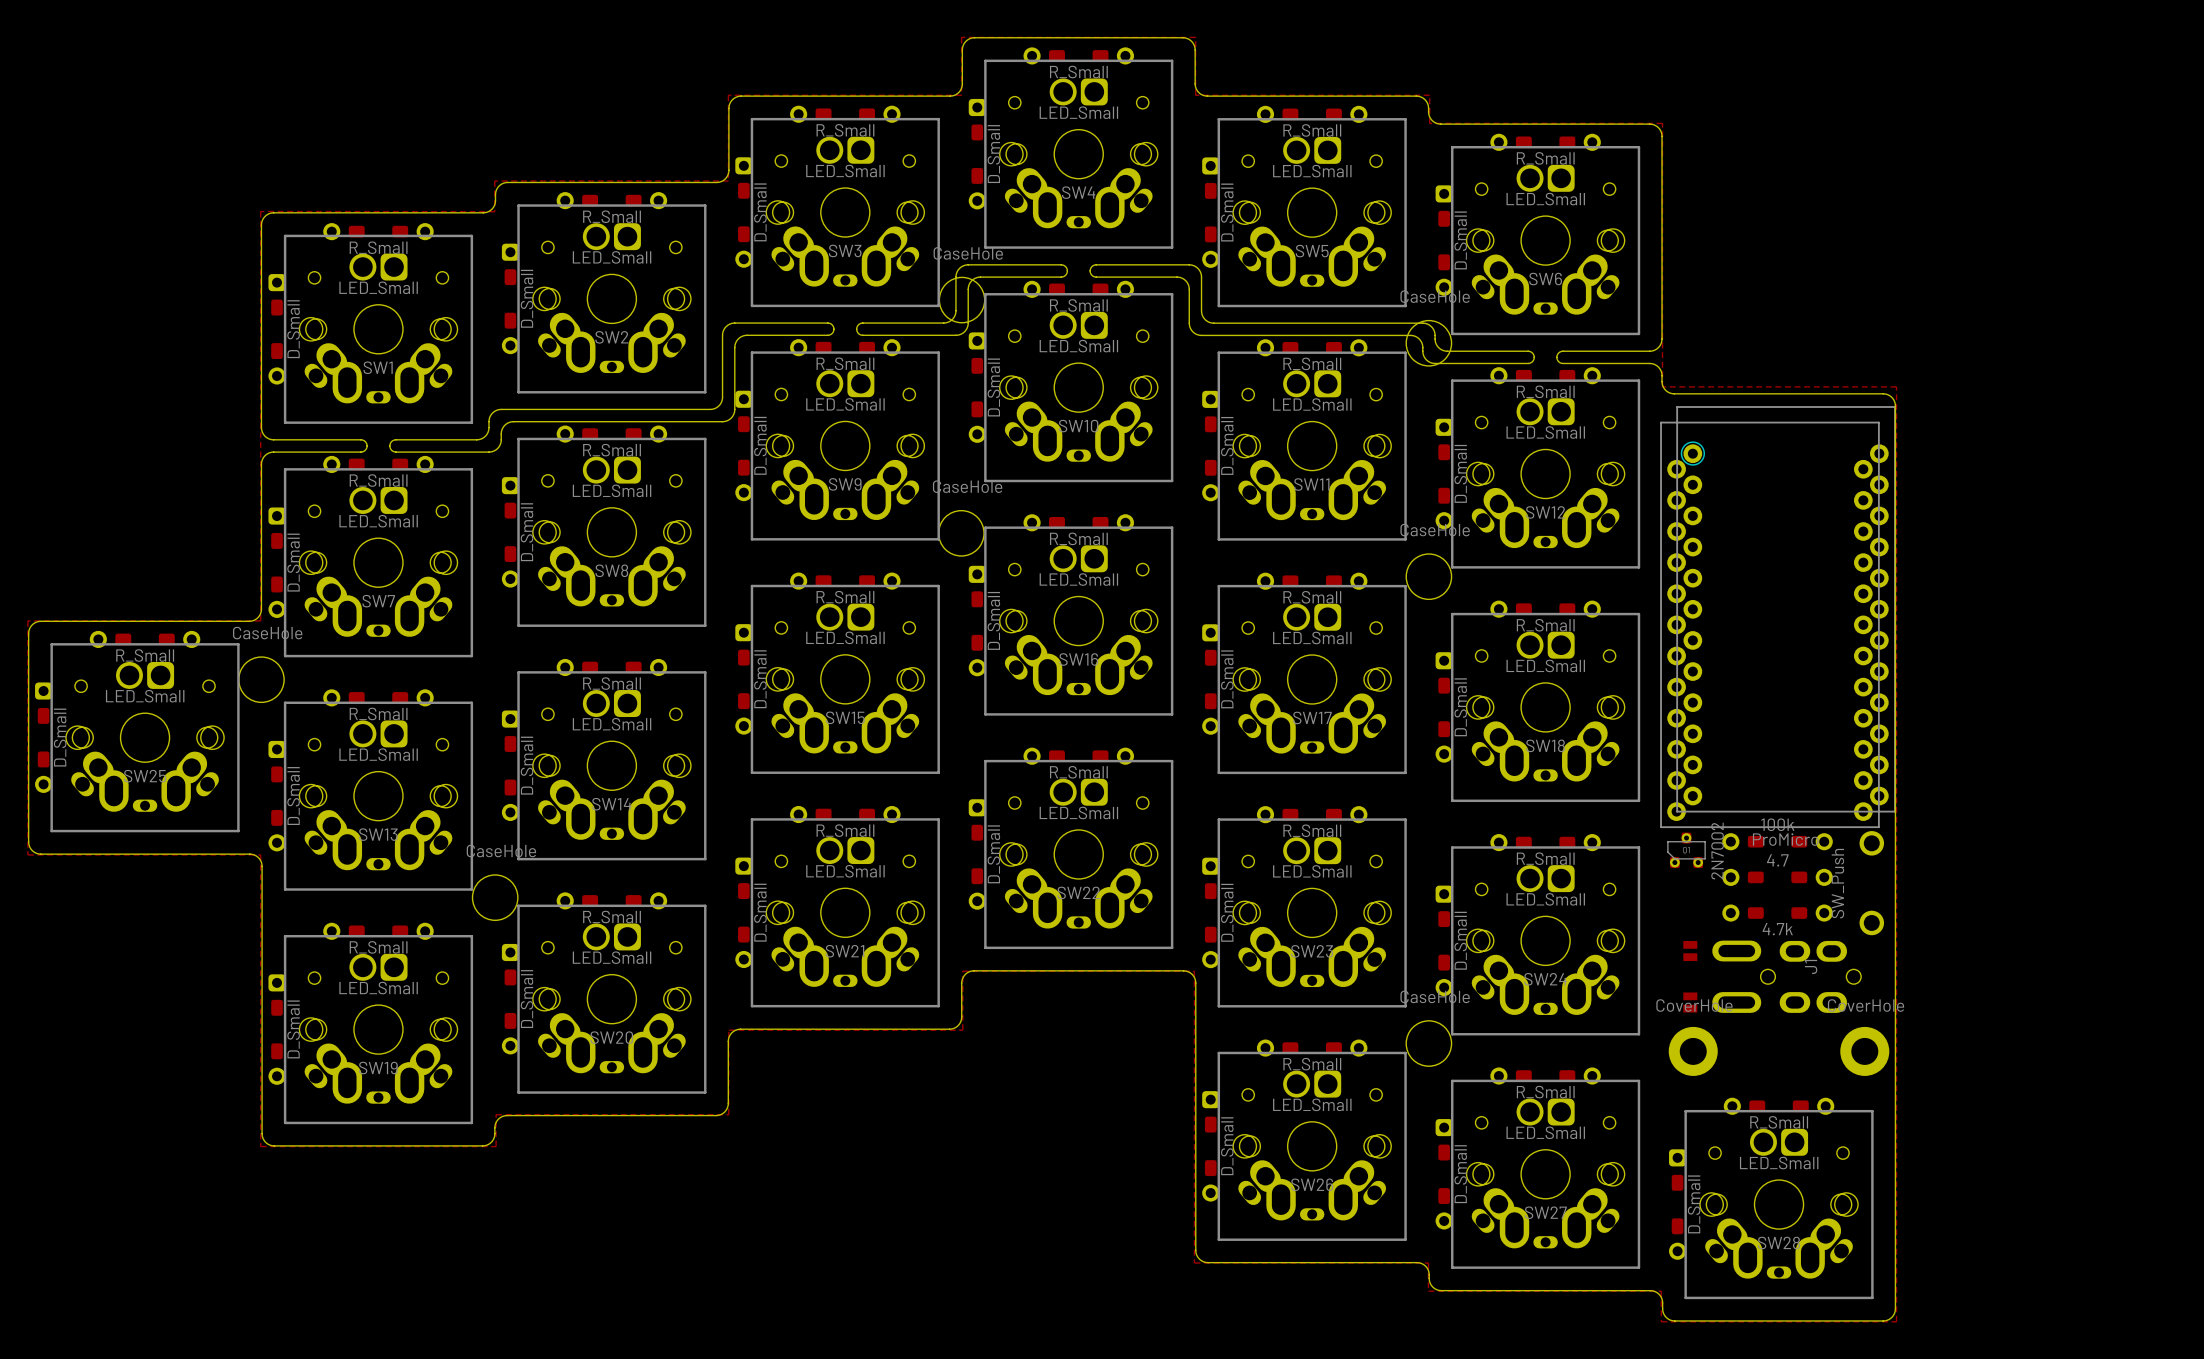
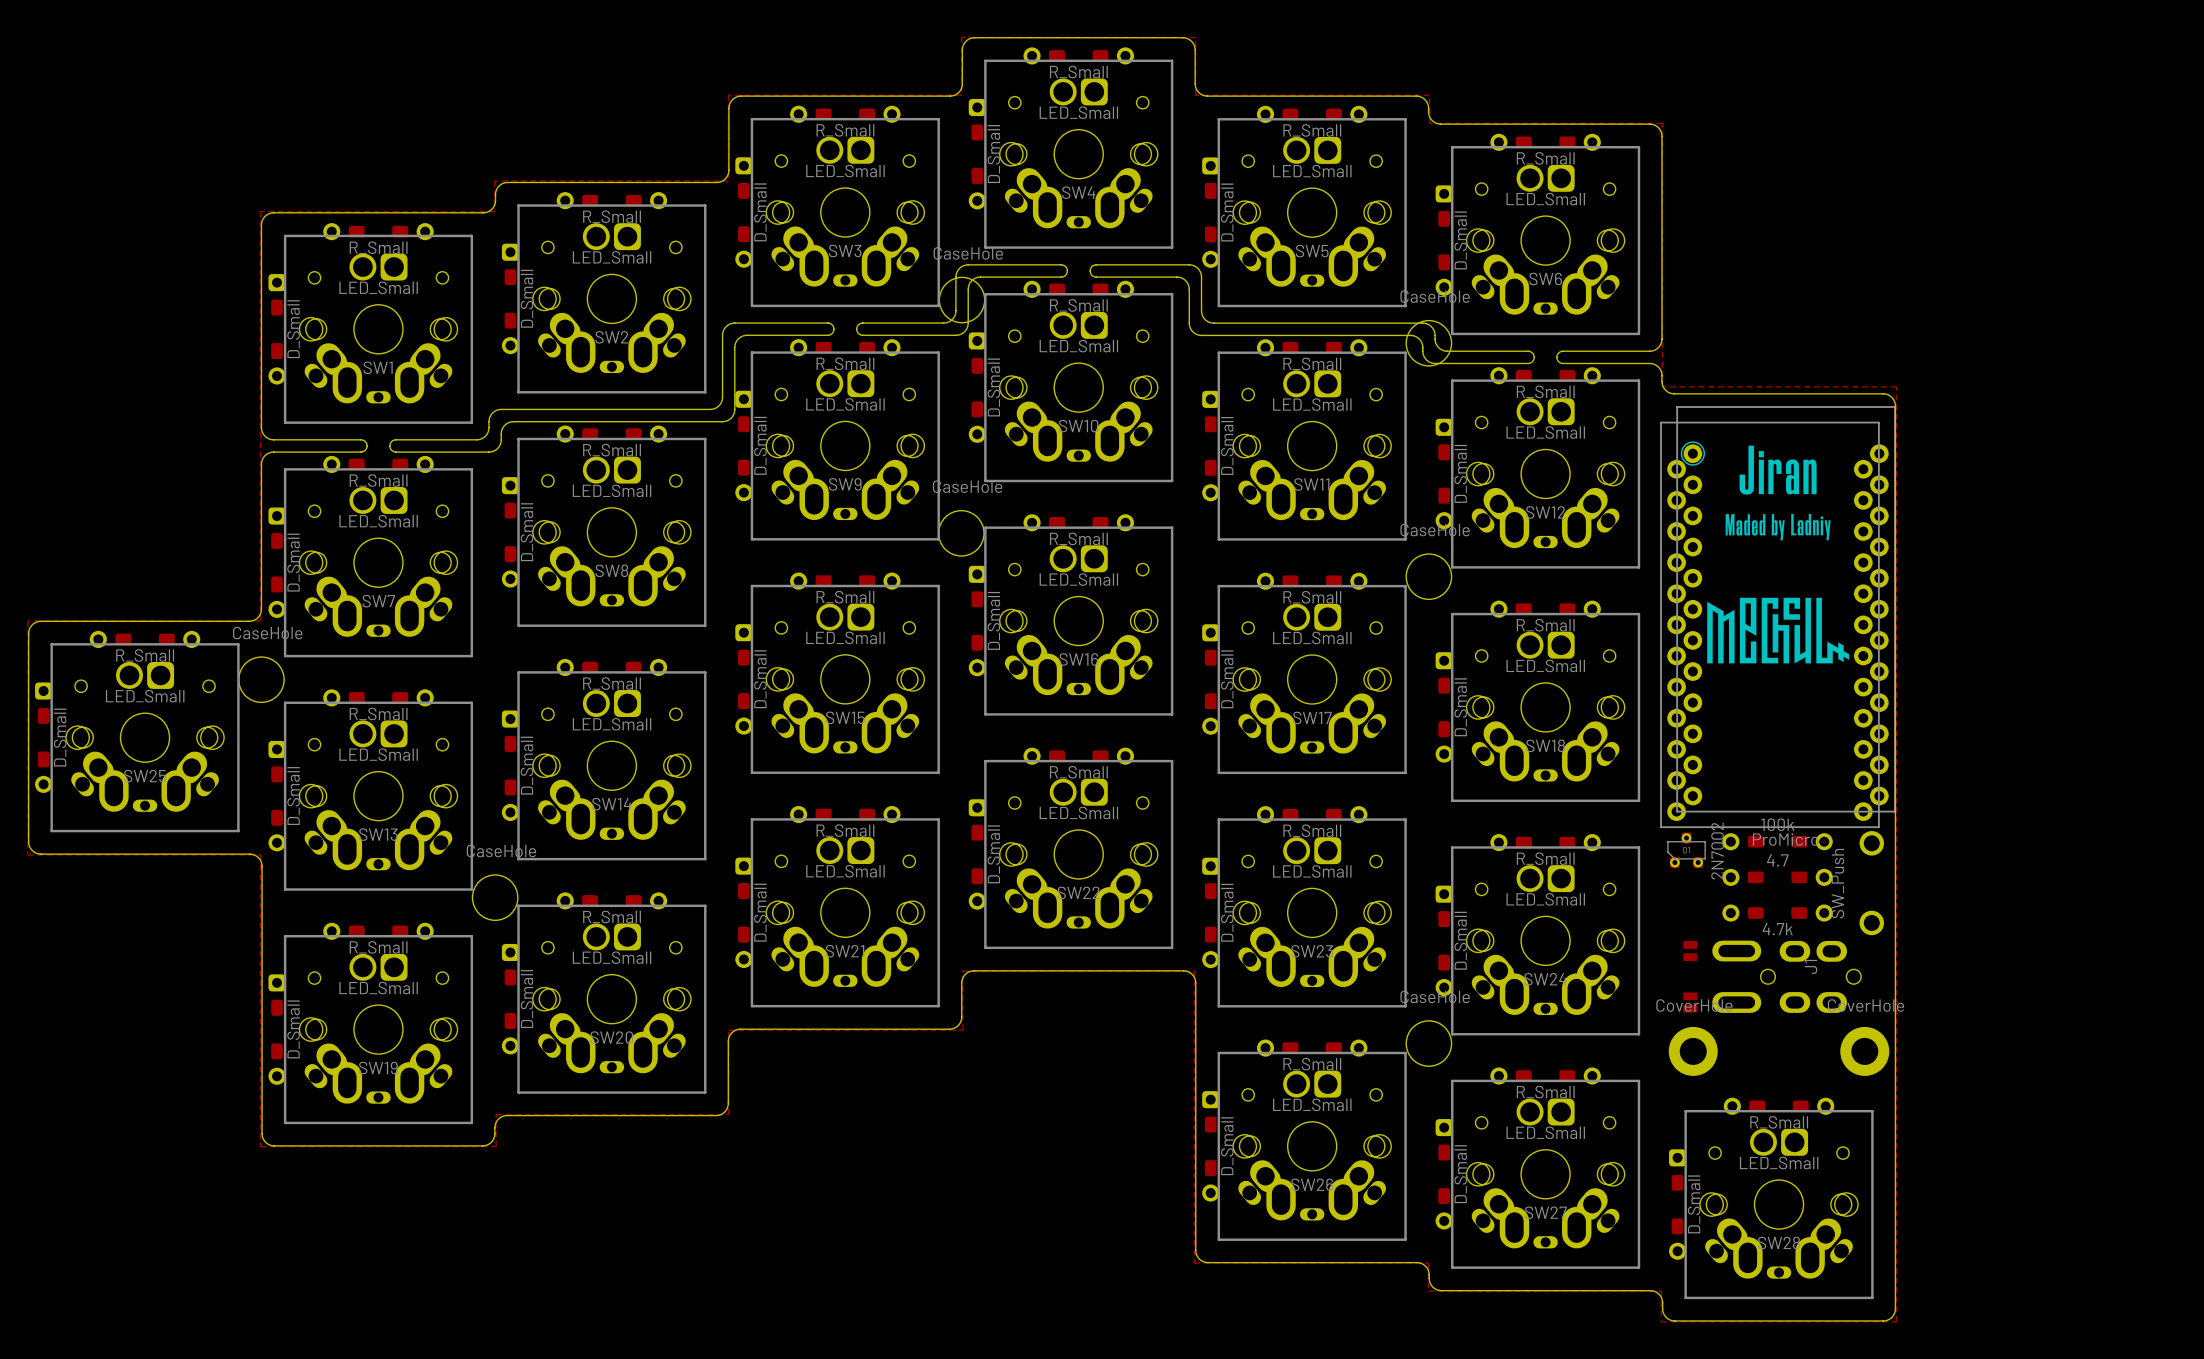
drawing: none -> [1707, 445, 1850, 664]

